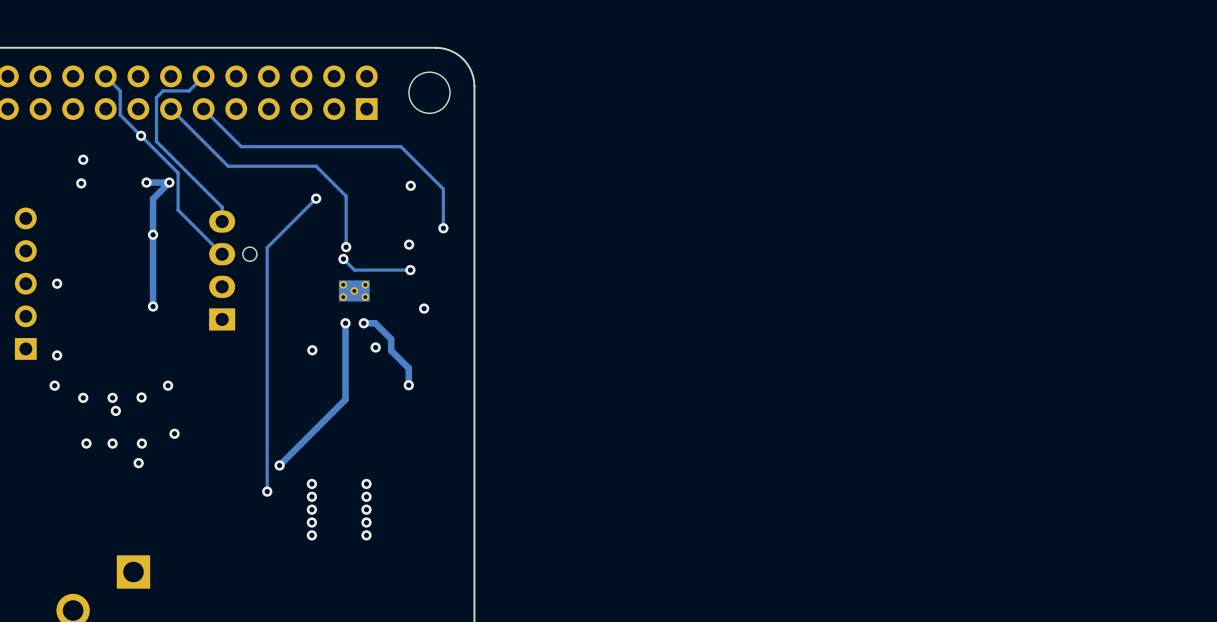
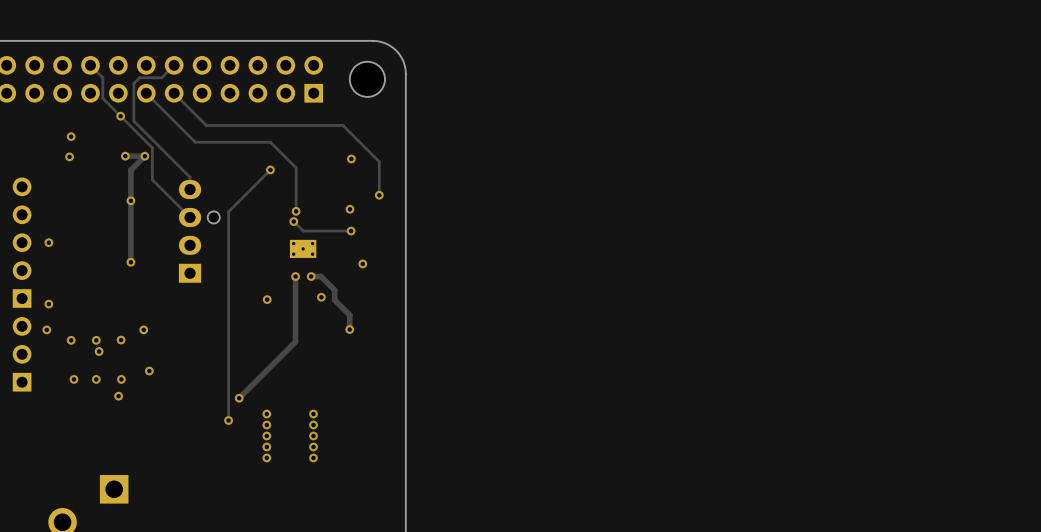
part: none -> (22, 354)

